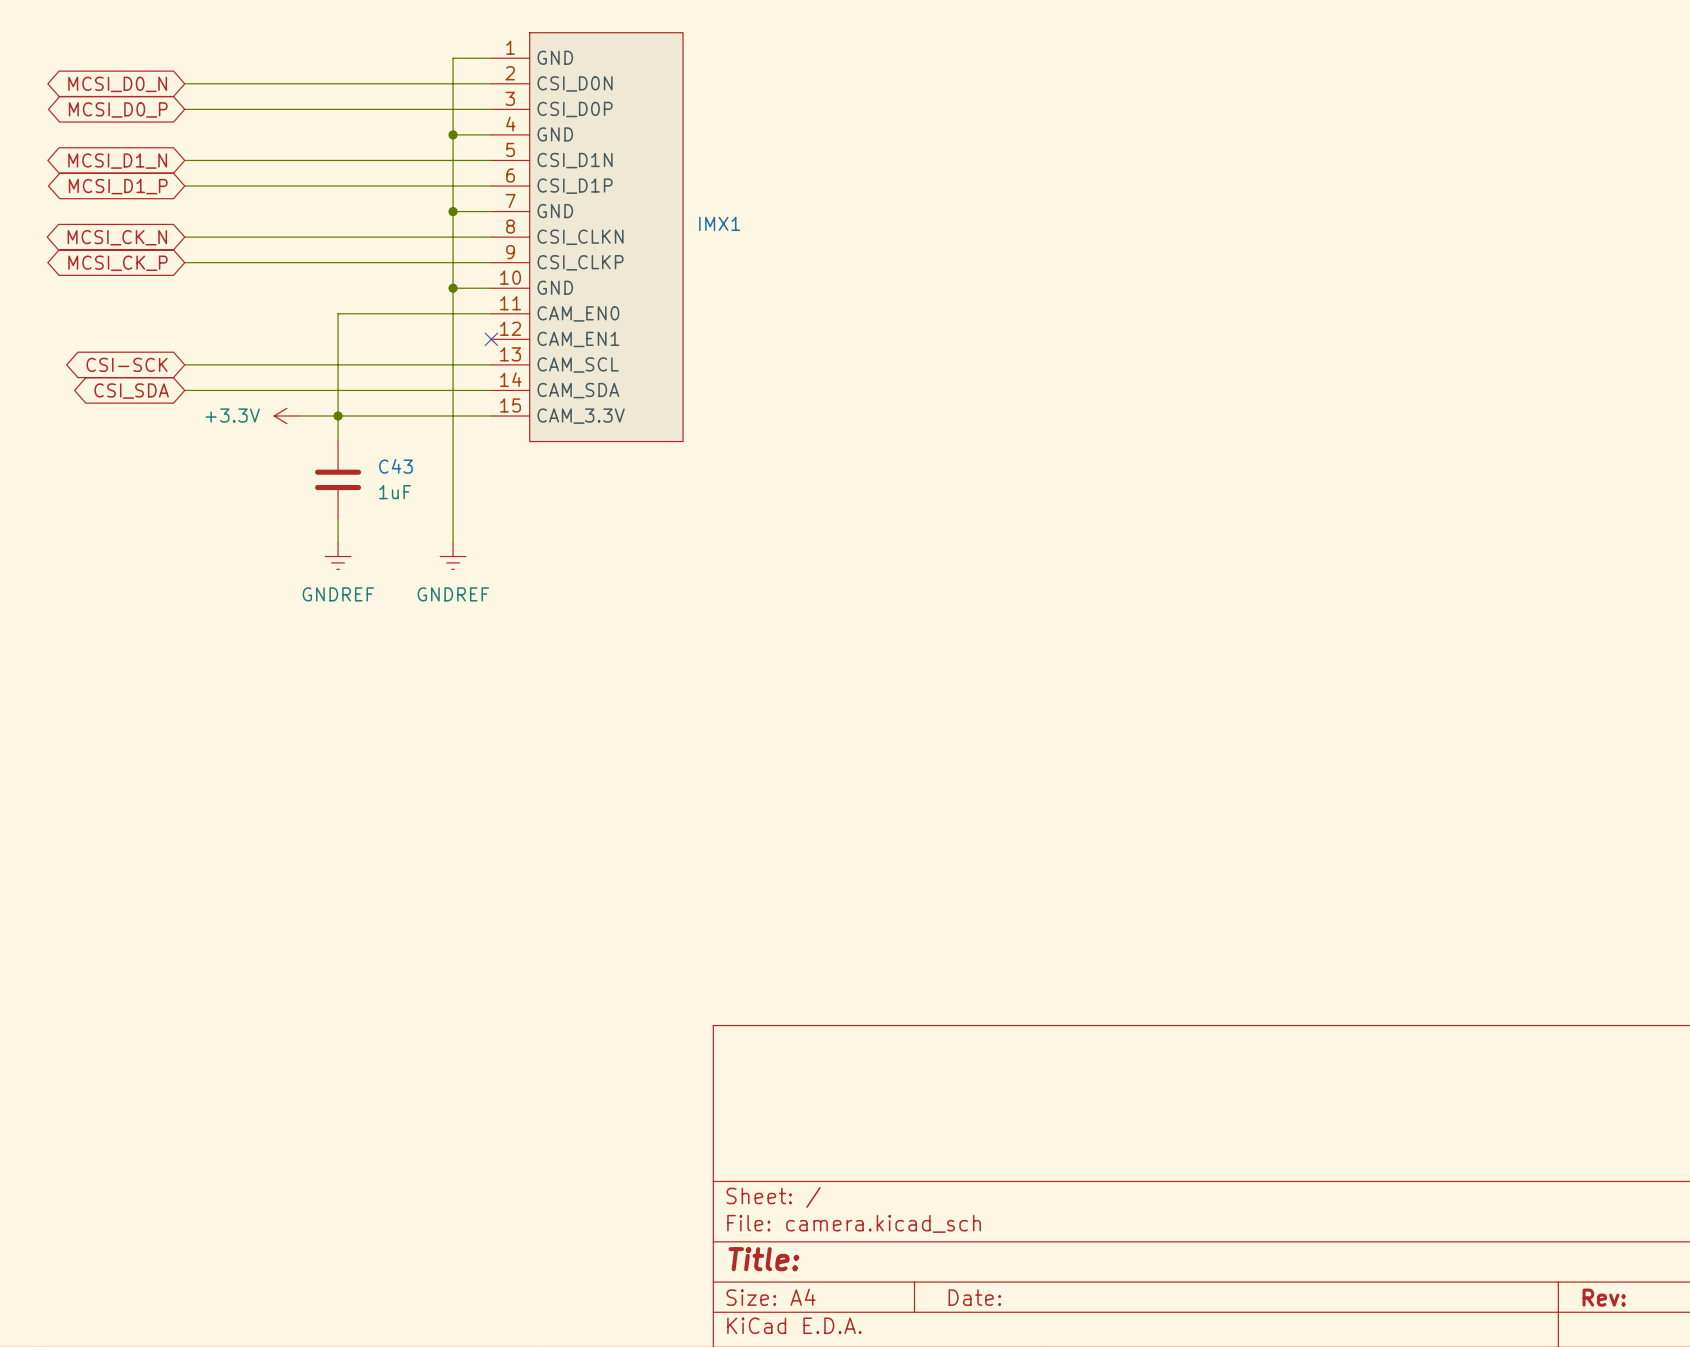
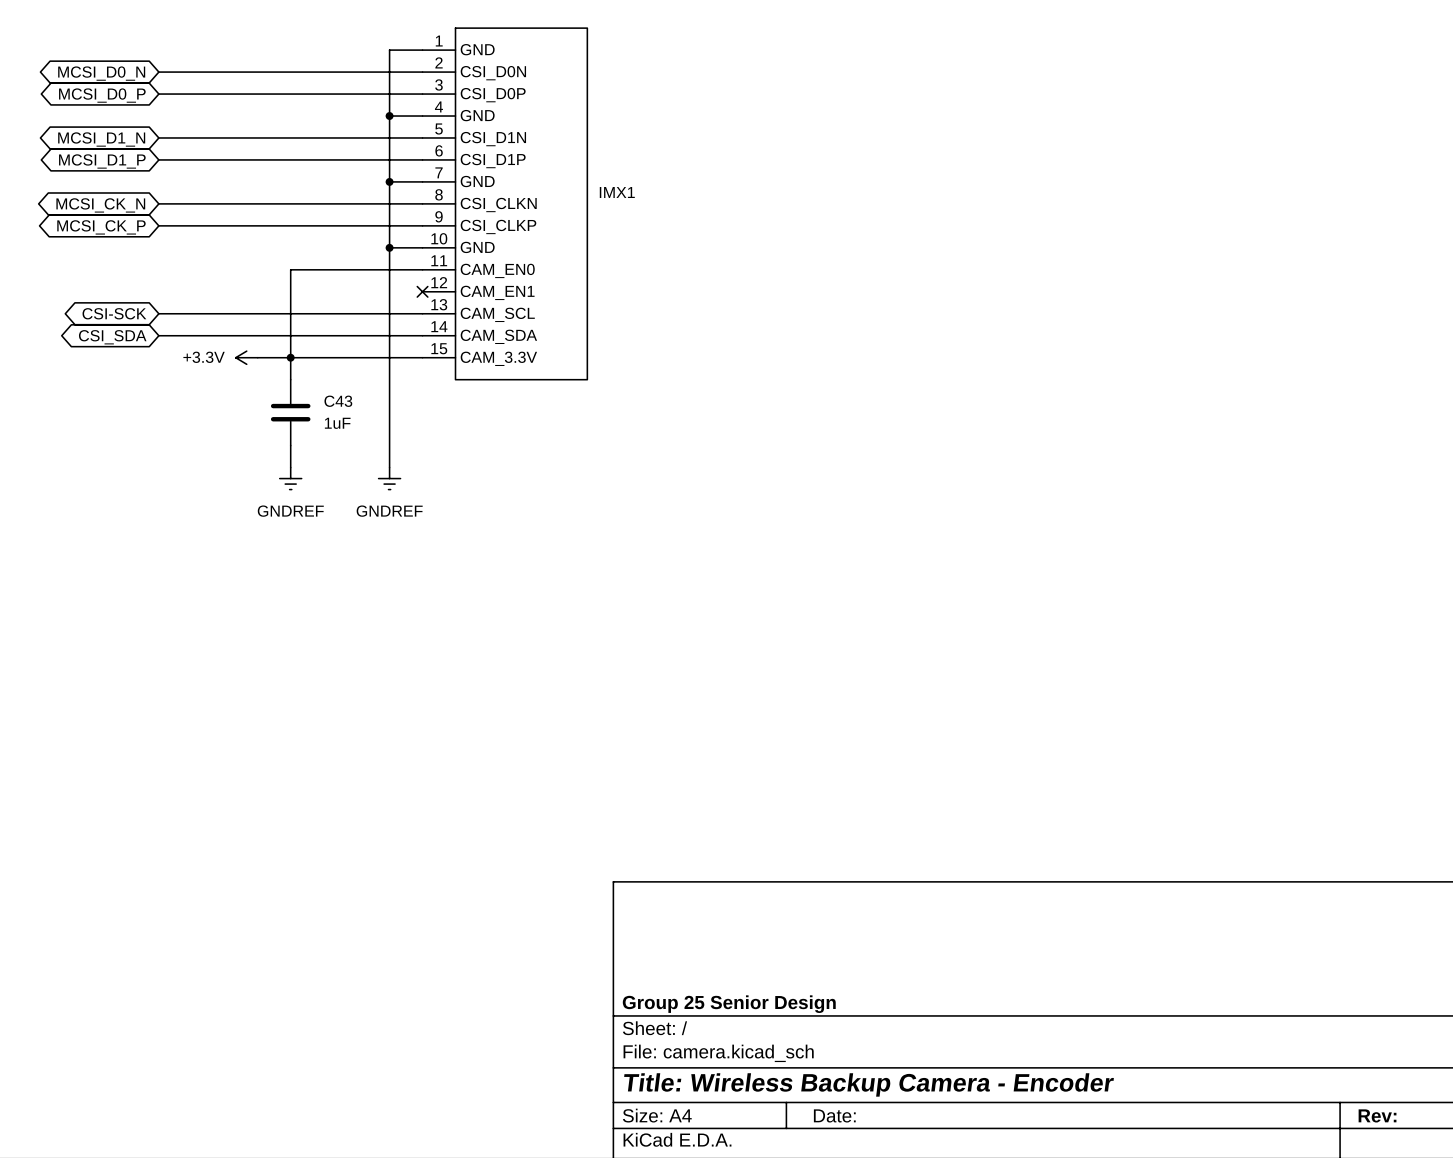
title block: none -> Group 25 Senior Design (729, 1004)
title block: Title: (763, 1259) -> Title: Wireless Backup Camera - Encoder (869, 1084)

